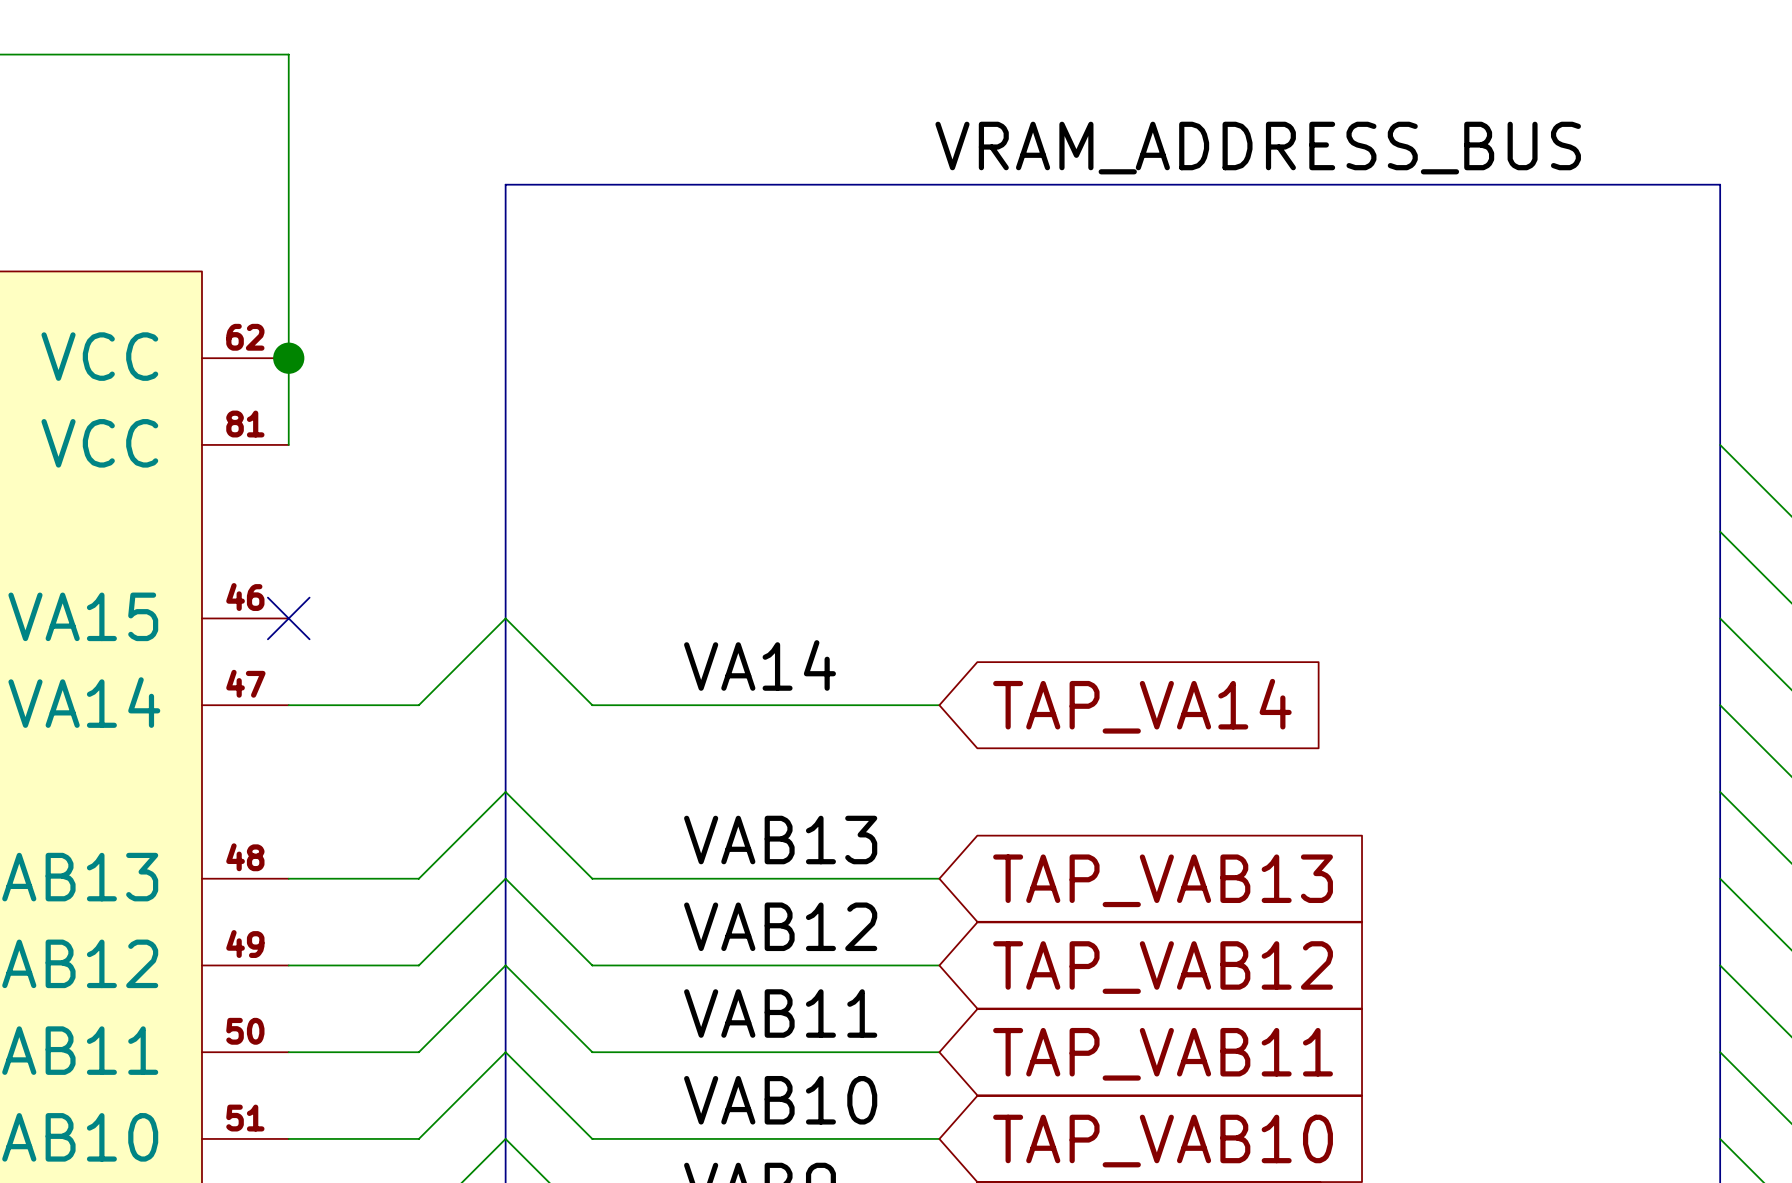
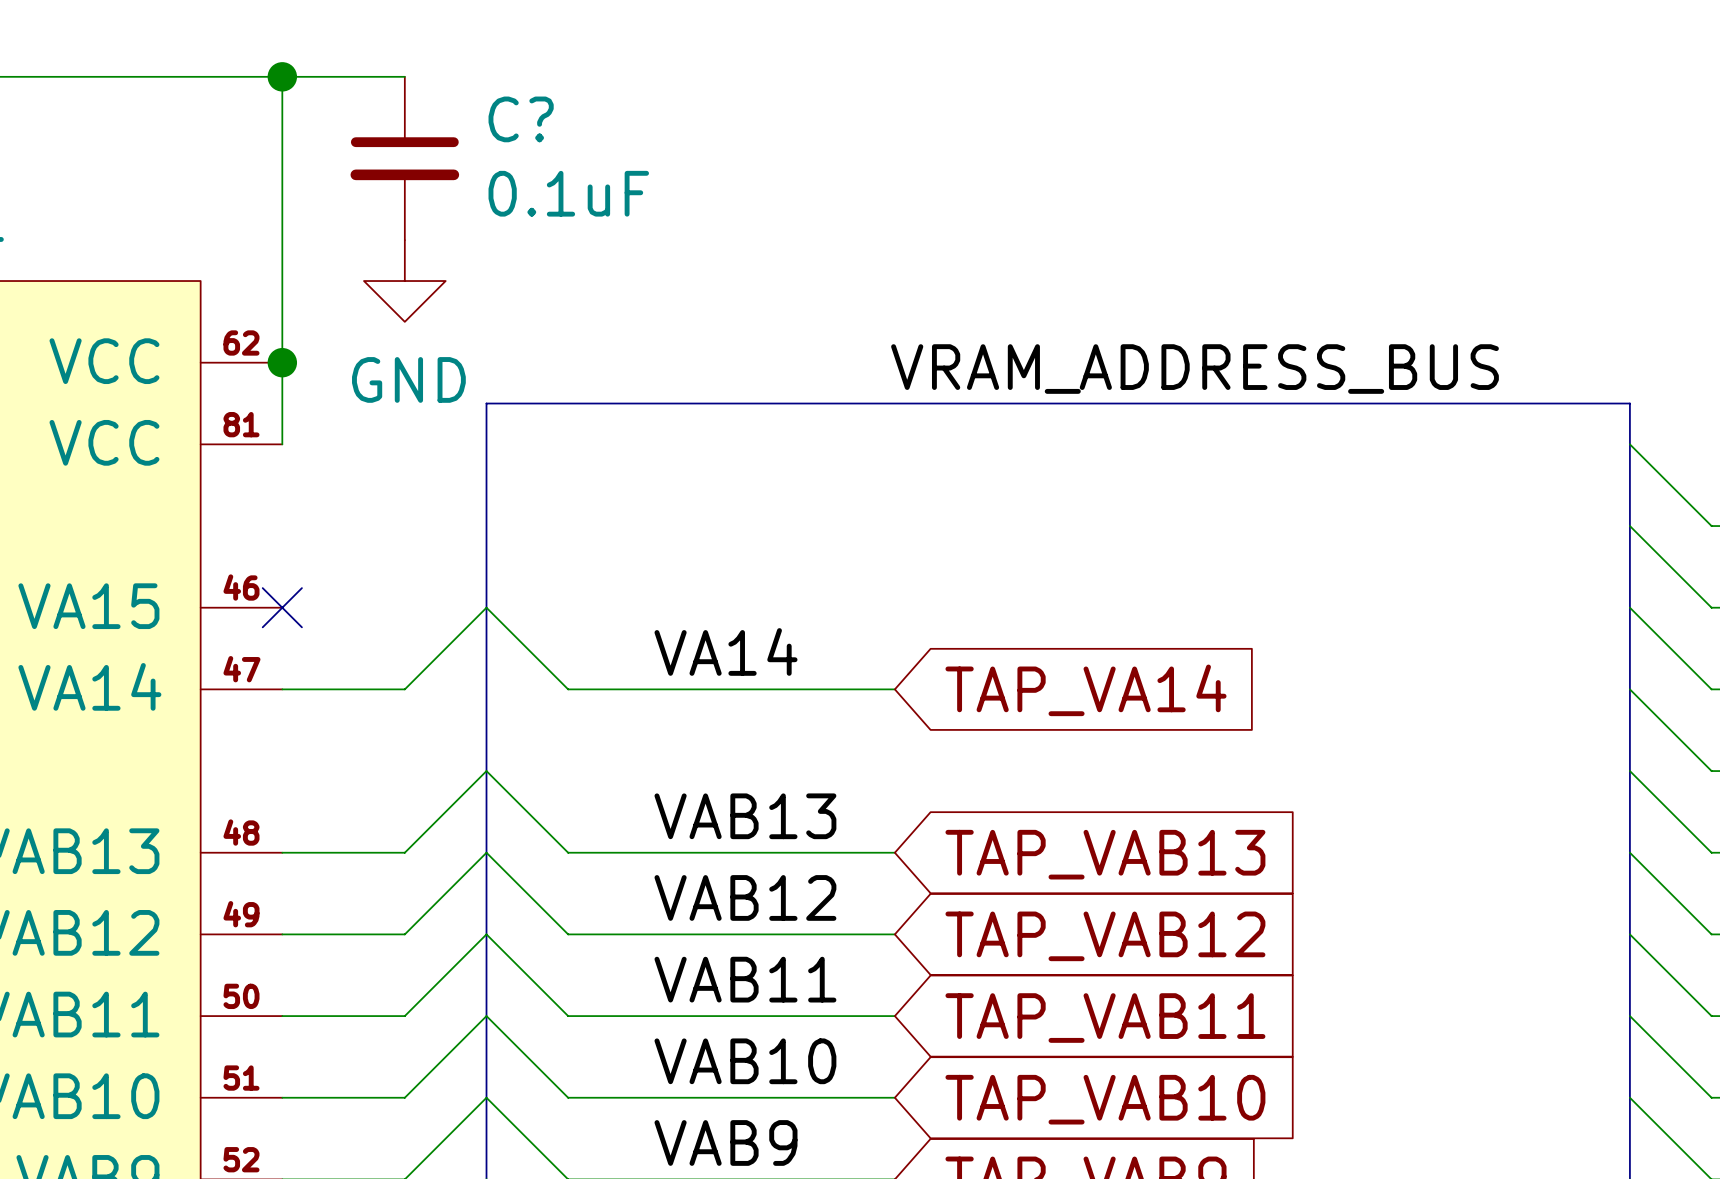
wire: none -> (282, 76) (404, 76)
junction: none -> (282, 76)
C?: none -> 0.1uF (404, 158)
label position: VRAM_ADDRESS_BUS (1258, 148) -> VRAM_ADDRESS_BUS (1195, 369)
power symbol: none -> GND (404, 281)
bus: (505, 401) (505, 184) (1720, 184) (1720, 401) -> (486, 403) (1629, 403)

